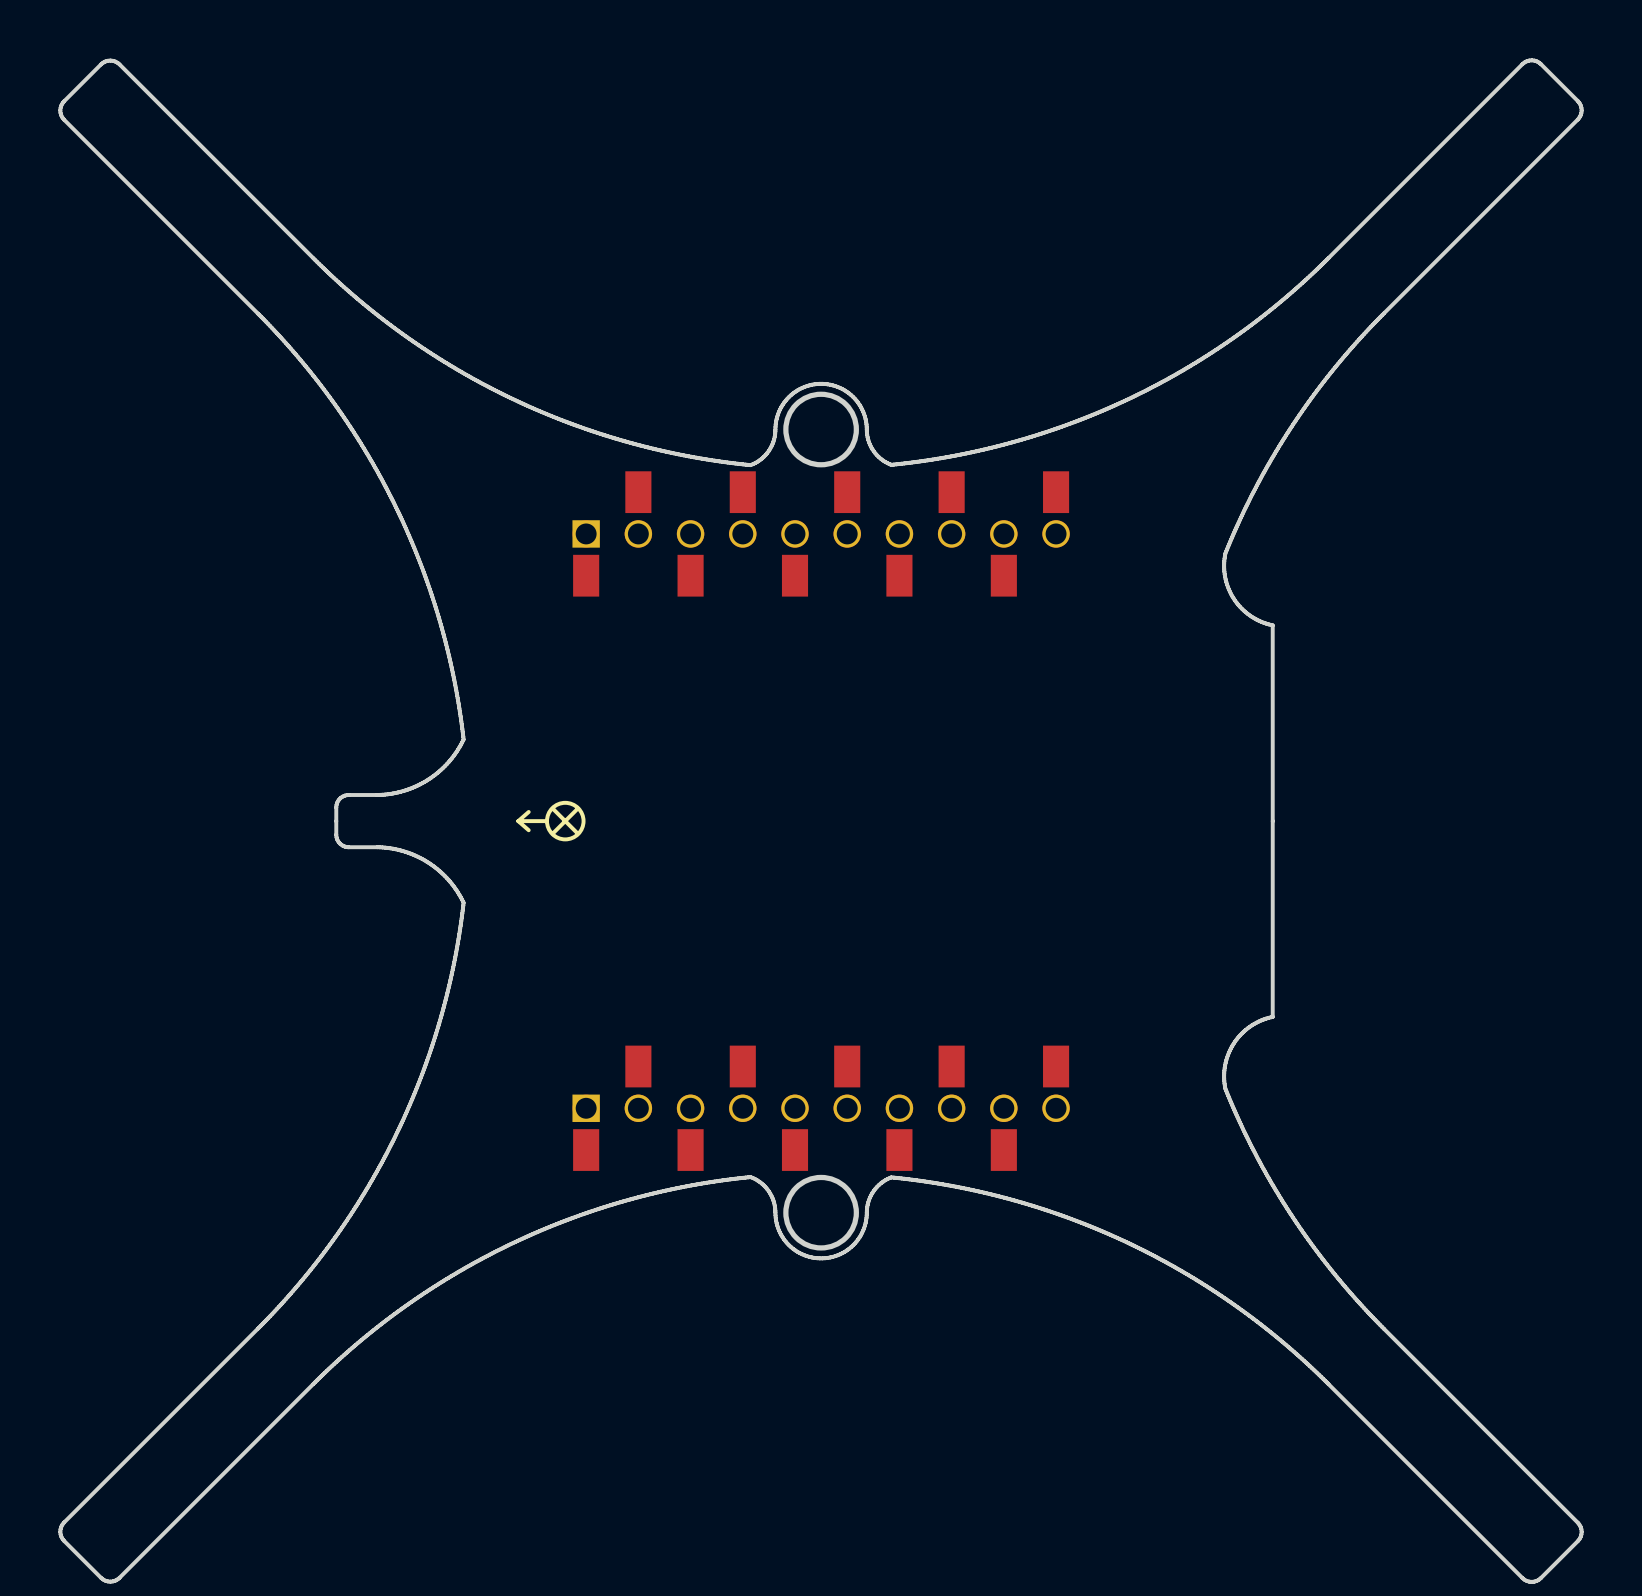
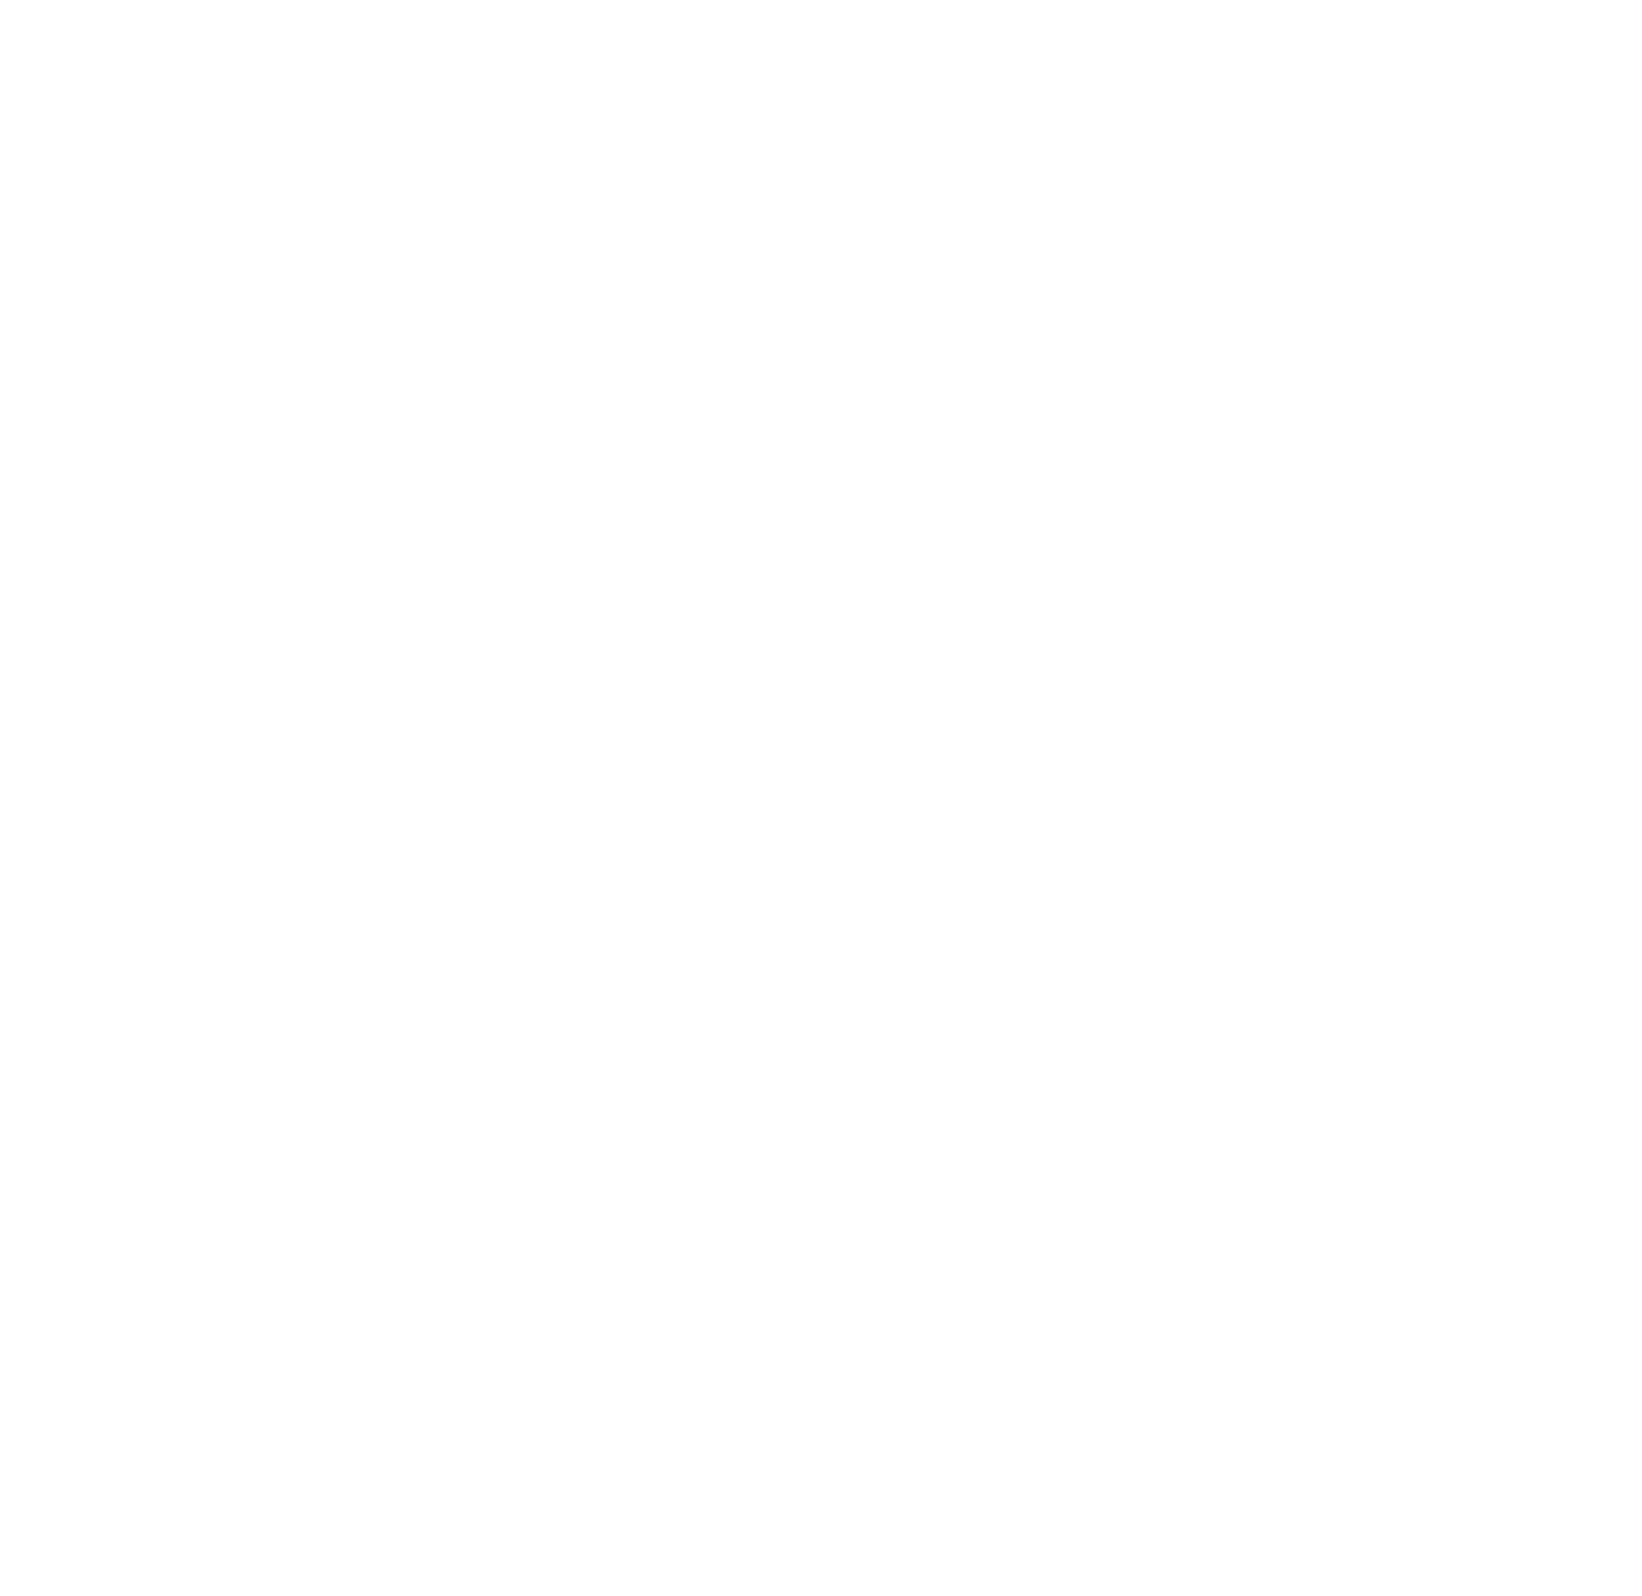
board edge: (1531, 60) (1522, 64) (1304, 281) (1255, 321) (1204, 357) (1131, 397) (1054, 429) (973, 451) (891, 464) (879, 457) (871, 447) (867, 437) (864, 416) (856, 400) (842, 389) (827, 384) (804, 386) (787, 398) (778, 414) (774, 439) (770, 448) (761, 458) (750, 465) (693, 457) (637, 444) (585, 428) (532, 407) (485, 385) (442, 360) (400, 332) (361, 302) (319, 263) (117, 62) (110, 60) (103, 62) (64, 101) (60, 110) (64, 119) (278, 335) (320, 385) (359, 441) (397, 509) (428, 584) (449, 659) (463, 739) (445, 765) (420, 784) (390, 793) (344, 795) (340, 798) (336, 804) (336, 834) (340, 844) (347, 847) (390, 848) (417, 856) (445, 876) (463, 902) (455, 956) (443, 1007) (428, 1057) (409, 1106) (386, 1153) (362, 1196) (334, 1237) (302, 1279) (262, 1323) (62, 1524) (60, 1531) (62, 1539) (101, 1577) (110, 1581) (119, 1577) (336, 1362) (388, 1318) (444, 1280) (515, 1241) (590, 1211) (668, 1190) (750, 1177) (761, 1183) (770, 1193) (774, 1205) (777, 1225) (785, 1241) (797, 1251) (814, 1257) (835, 1256) (854, 1243) (864, 1228) (871, 1195) (879, 1184) (891, 1177) (948, 1185) (1004, 1197) (1056, 1213) (1110, 1234) (1157, 1257) (1200, 1282) (1241, 1309) (1280, 1340) (1323, 1378) (1524, 1579) (1531, 1581) (1539, 1579) (1577, 1541) (1581, 1531) (1577, 1522) (1374, 1319) (1320, 1256) (1288, 1211) (1260, 1164) (1231, 1103) (1225, 1088) (1224, 1078) (1227, 1057) (1236, 1039) (1251, 1025) (1272, 1016) (1272, 625) (1249, 615) (1233, 598) (1225, 576) (1225, 553) (1247, 503) (1273, 455) (1303, 409) (1334, 367) (1378, 319) (1579, 117) (1581, 110) (1577, 101) (1540, 64) (1531, 60) -> none
round board edge: [783, 391, 859, 468] -> none
part: (821, 533) -> none
drawing: [516, 800, 586, 842] -> none
part: (821, 1108) -> none
round board edge: [783, 1174, 859, 1251] -> none

